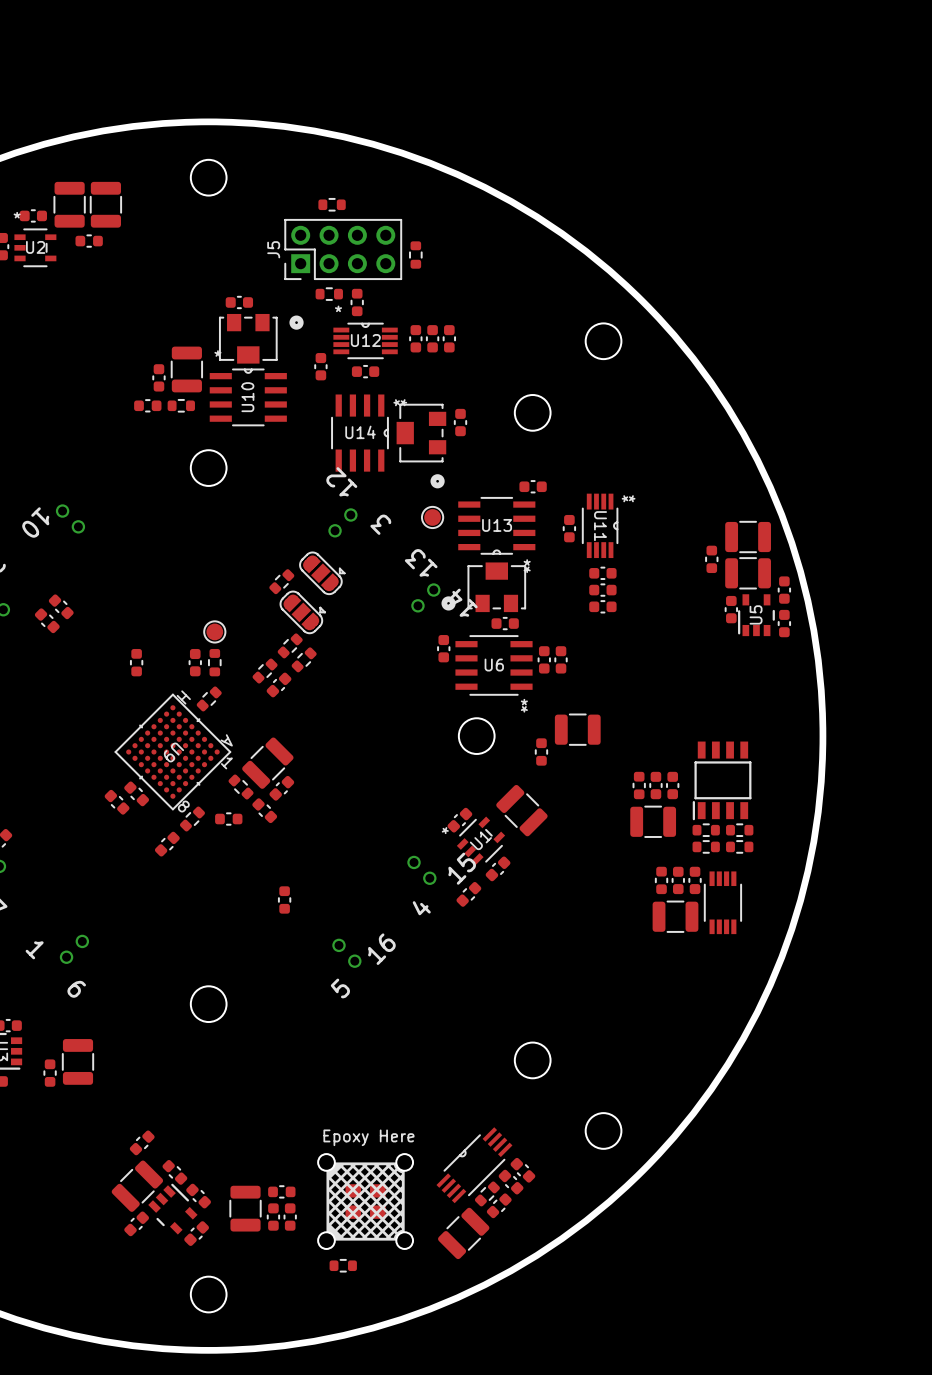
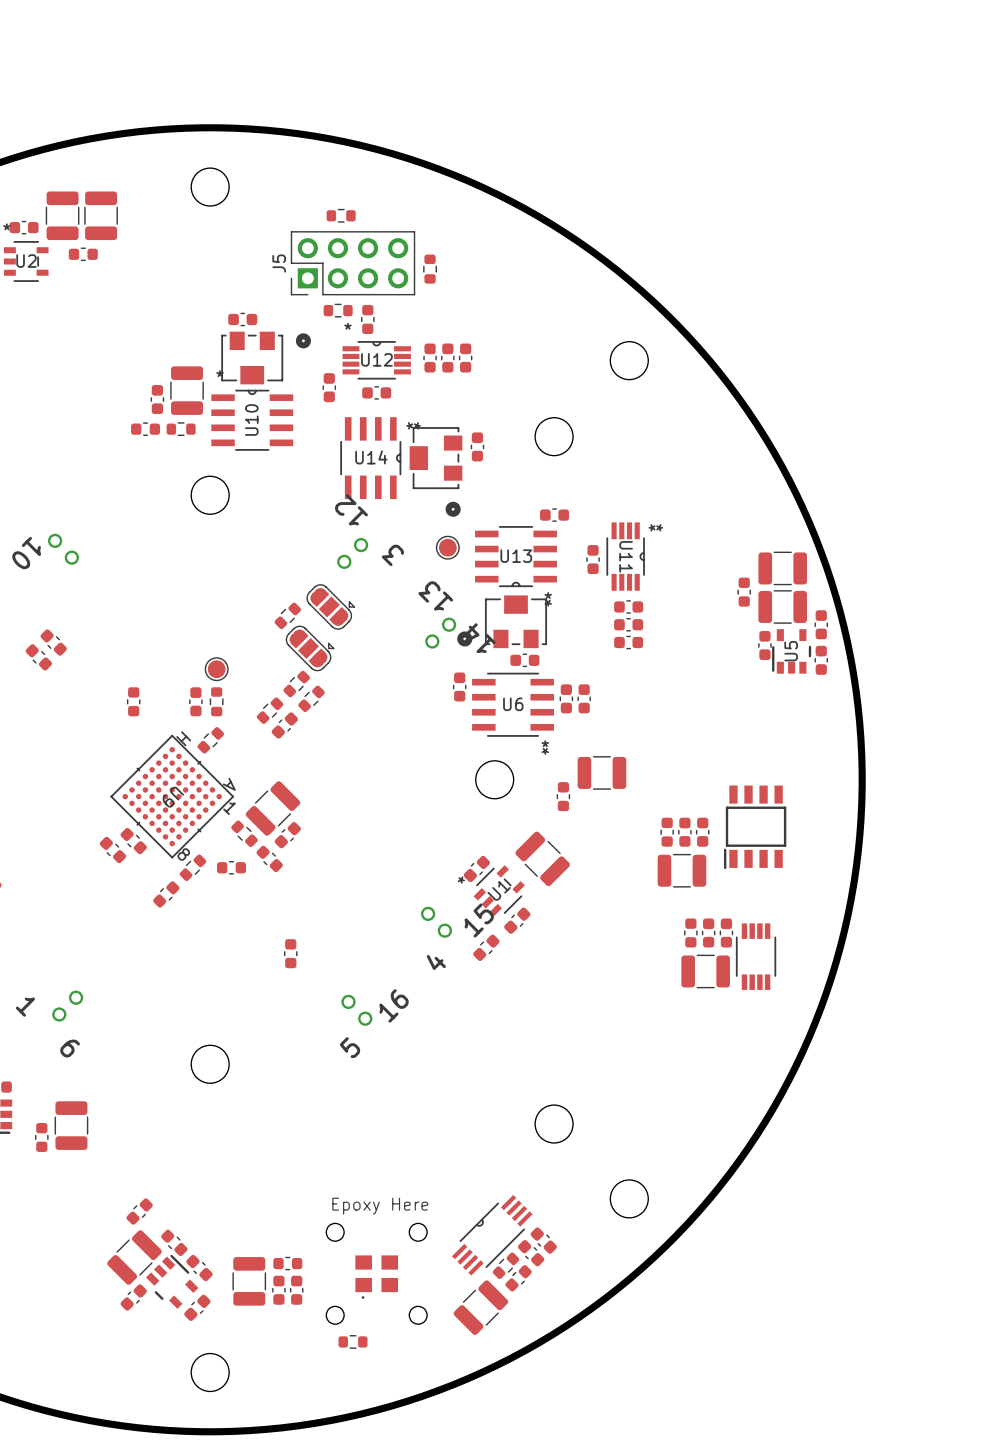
part: (706, 830) -> none
part: (739, 830) -> none
part: (706, 846) -> none
part: (739, 846) -> none
drawing: [326, 1162, 405, 1241] -> none

